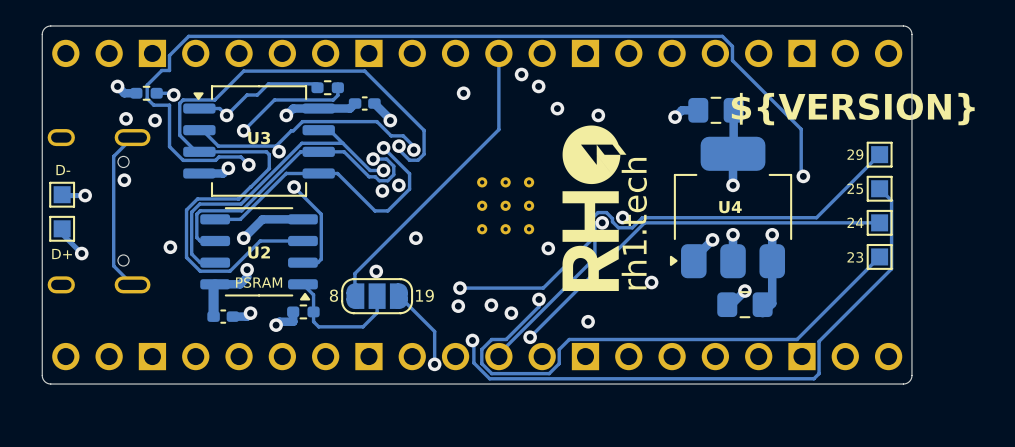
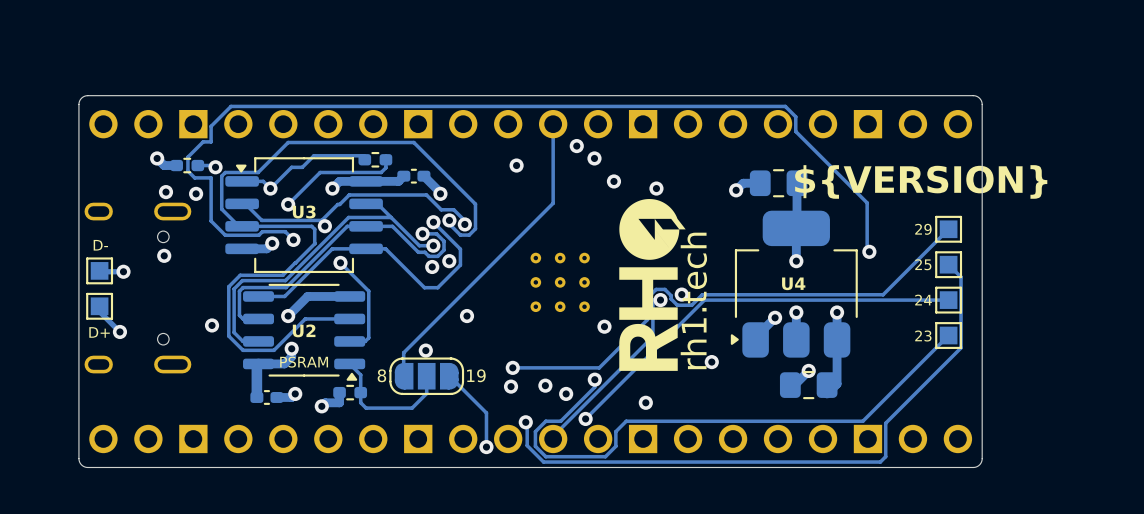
track: (132, 137) (113, 156) (113, 266) (132, 284) -> none

